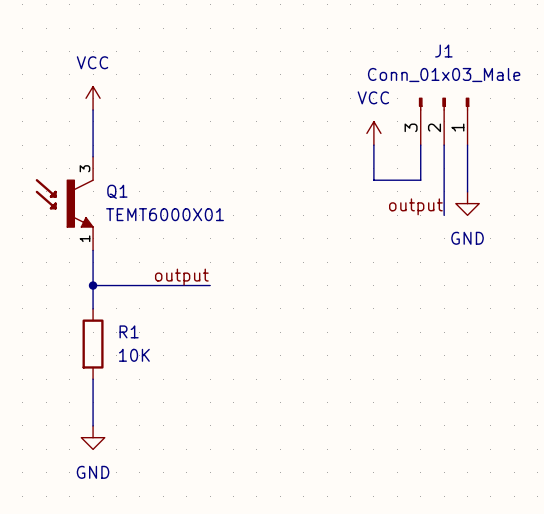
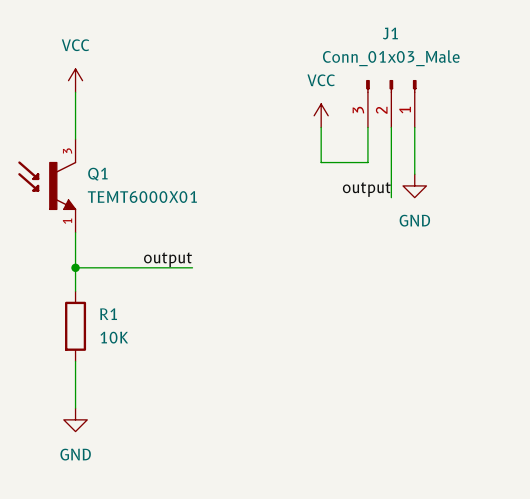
J1 position: (444, 121) -> (391, 103)
power symbol position: VCC (373, 133) -> VCC (321, 115)
wire: (373, 145) (373, 180) -> (321, 127) (321, 162) (356, 162)
wire: (420, 145) (420, 180) (385, 180) -> (367, 127) (367, 162)
wire: (444, 145) (444, 215) -> (391, 127) (391, 197)
wire: (467, 145) (467, 191) -> (414, 127) (414, 174)
power symbol position: GND (467, 203) -> GND (414, 185)
label position: output (415, 206) -> output (366, 189)

